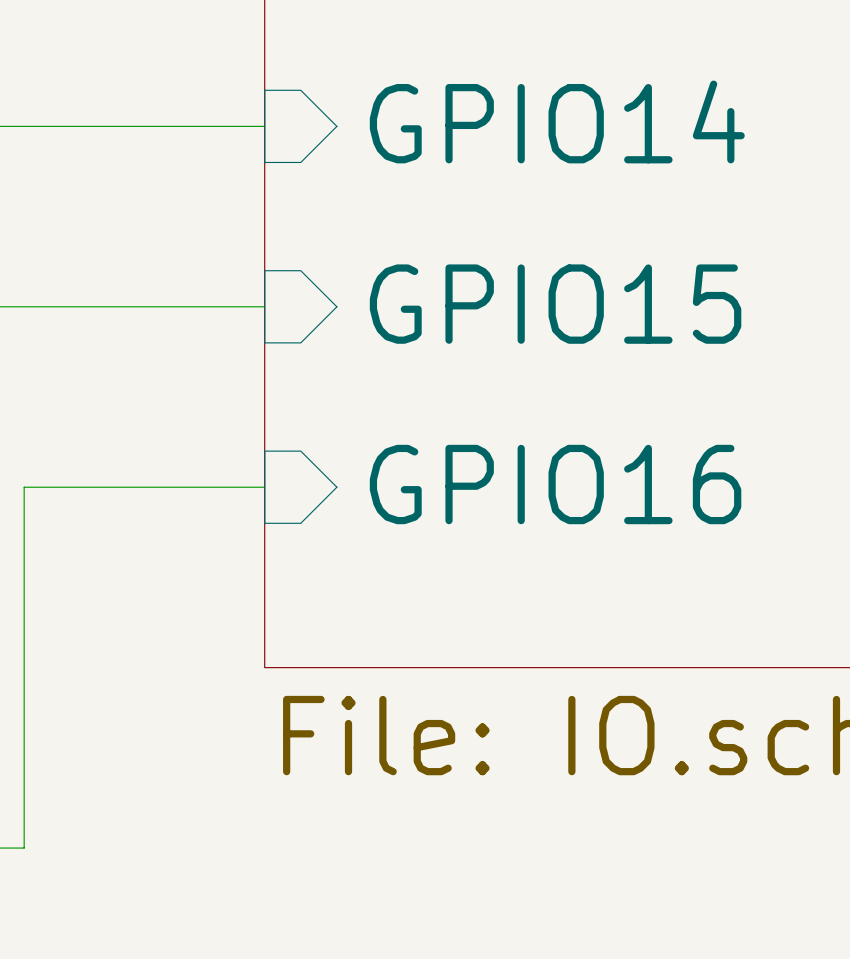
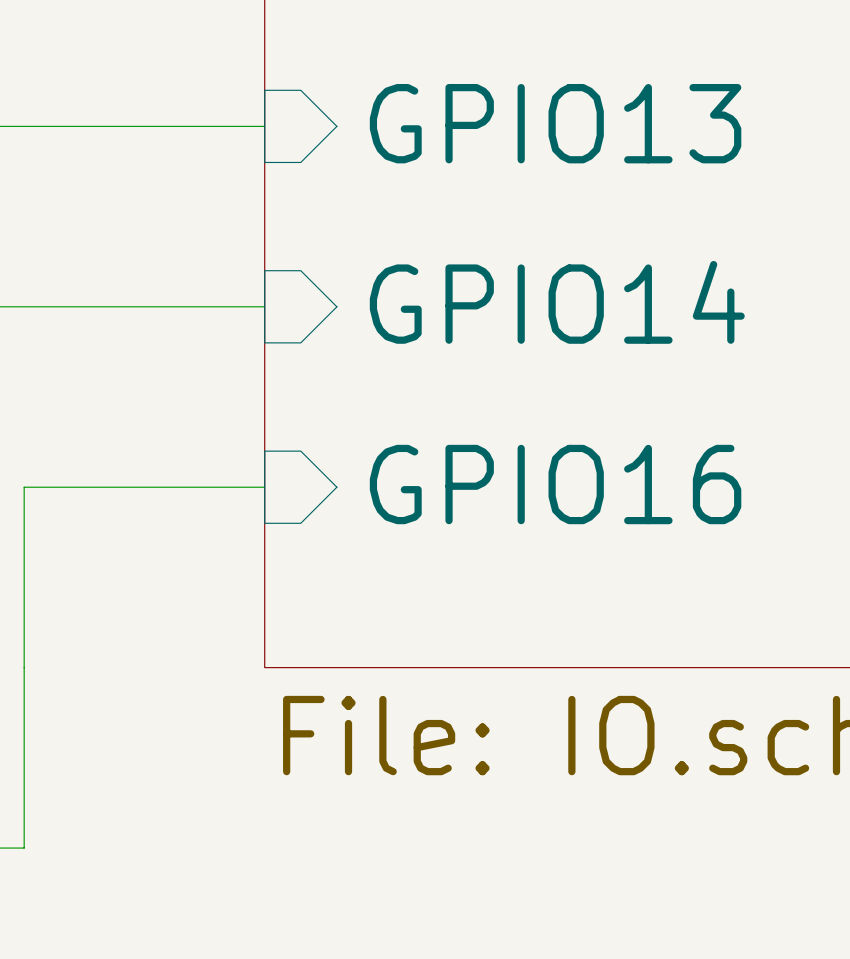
sheet pin: GPIO14 (557, 121) -> GPIO13 (555, 123)
sheet pin: GPIO15 (555, 304) -> GPIO14 (557, 302)

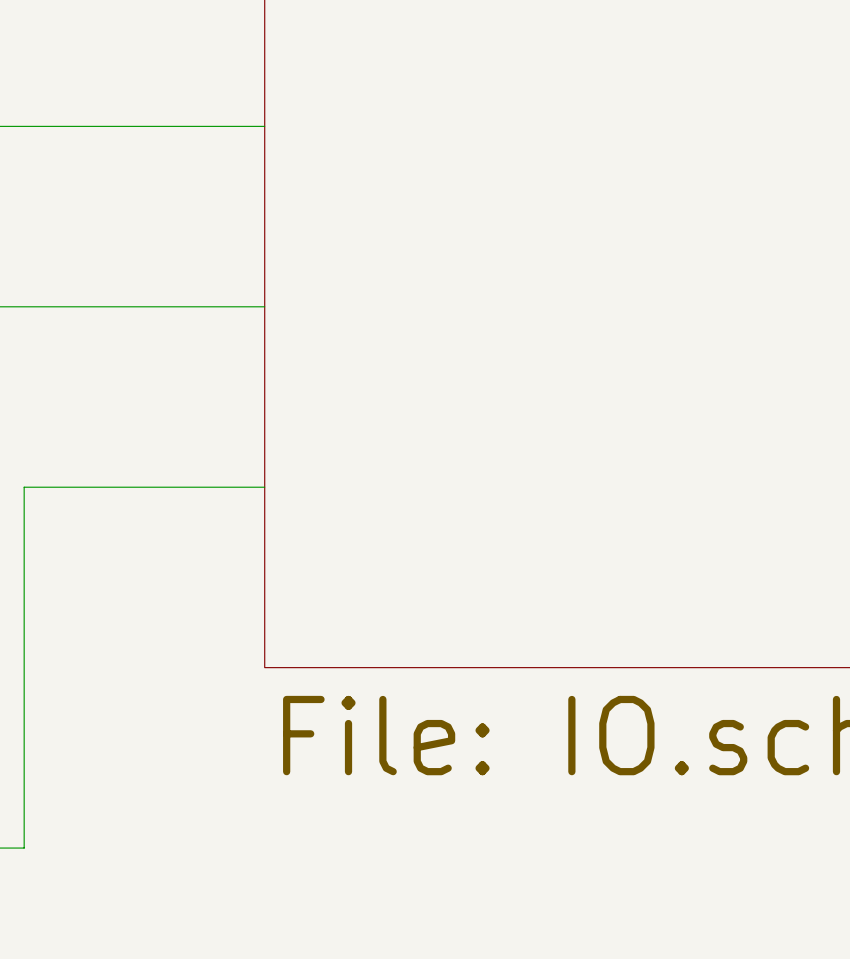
sheet pin: GPIO13 (555, 123) -> none
sheet pin: GPIO14 (557, 302) -> none
sheet pin: GPIO16 (555, 484) -> none

